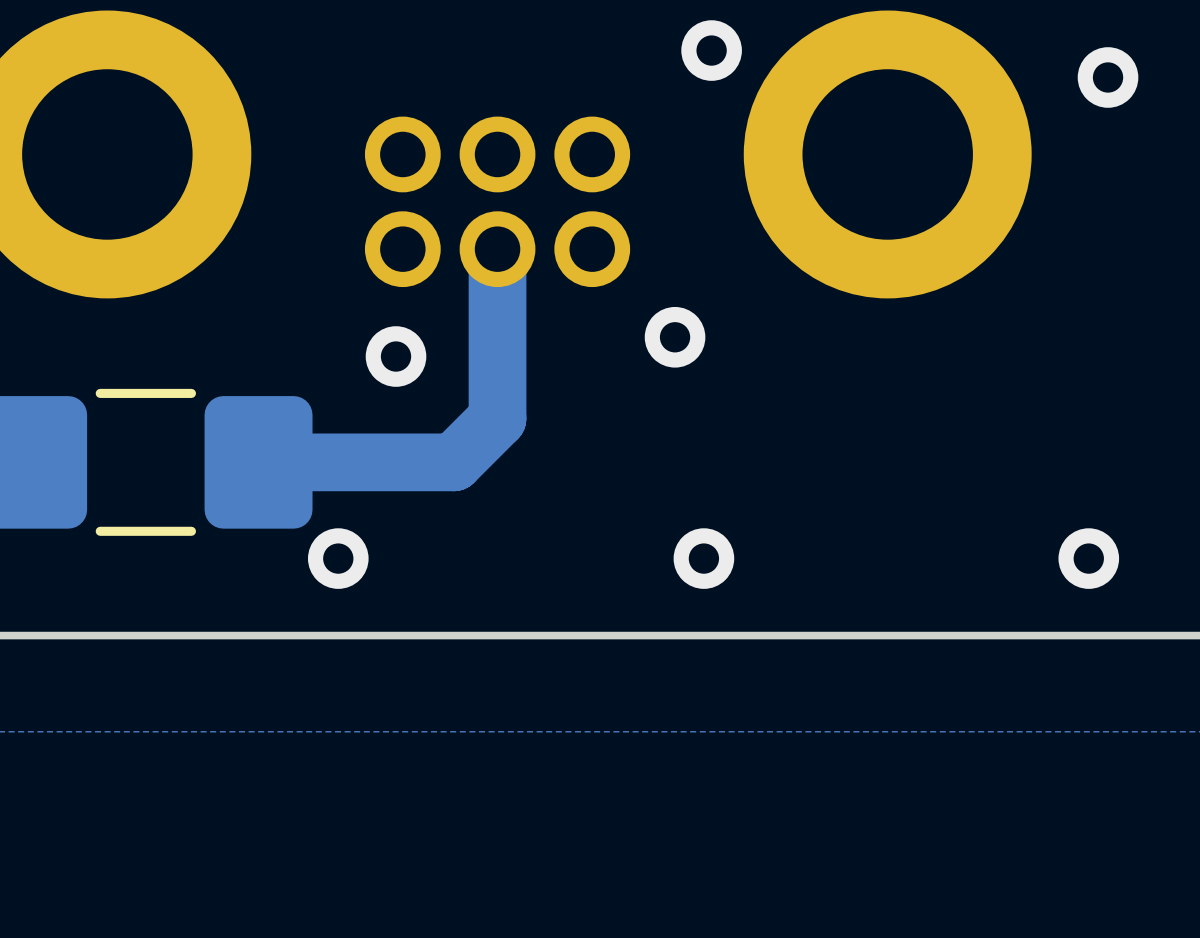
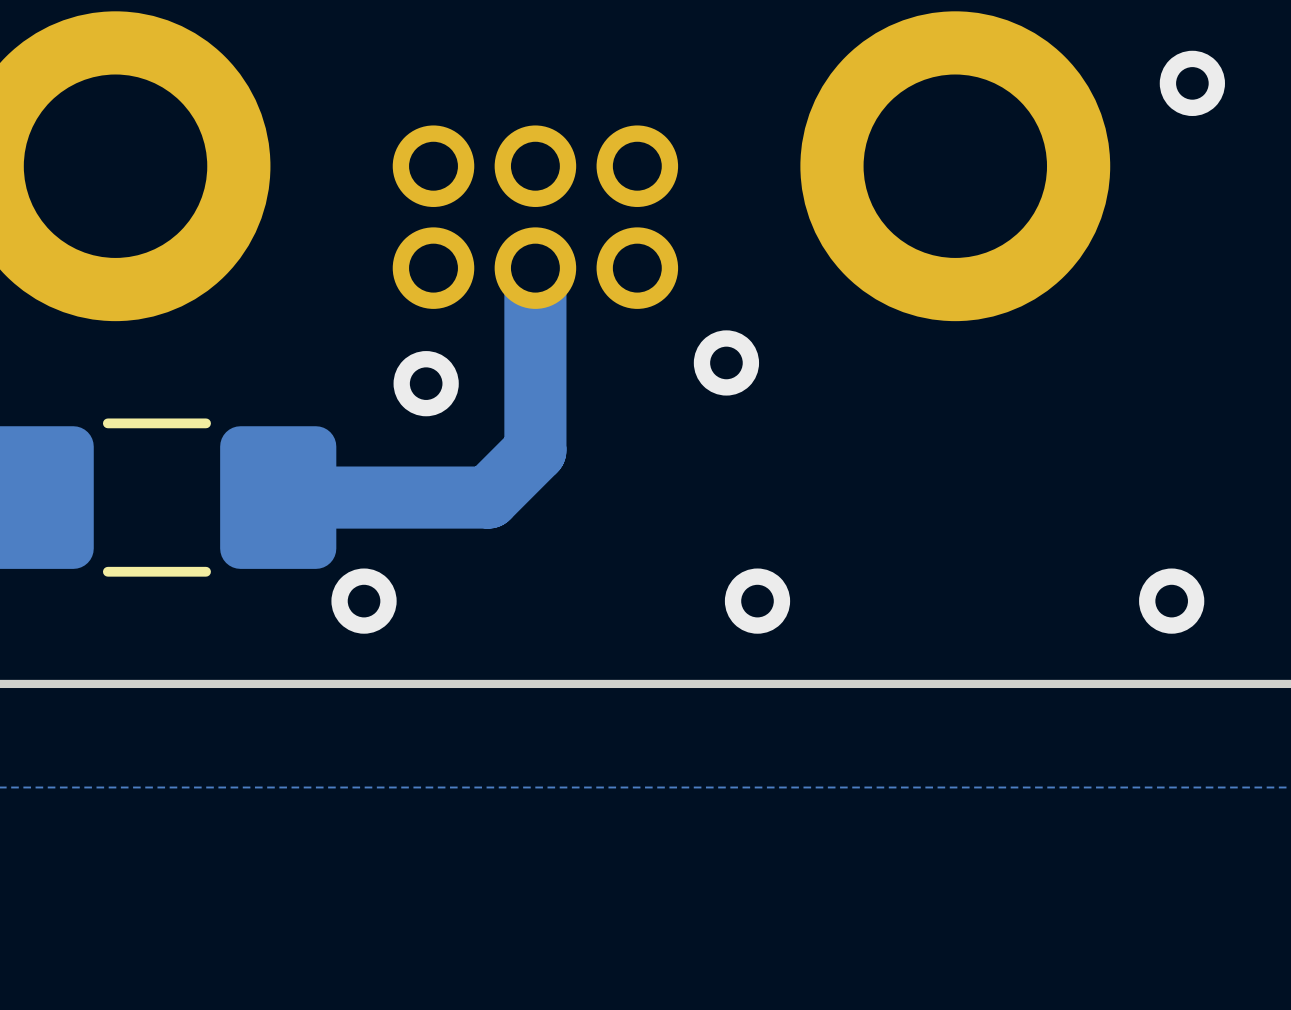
via: (711, 50) -> none

